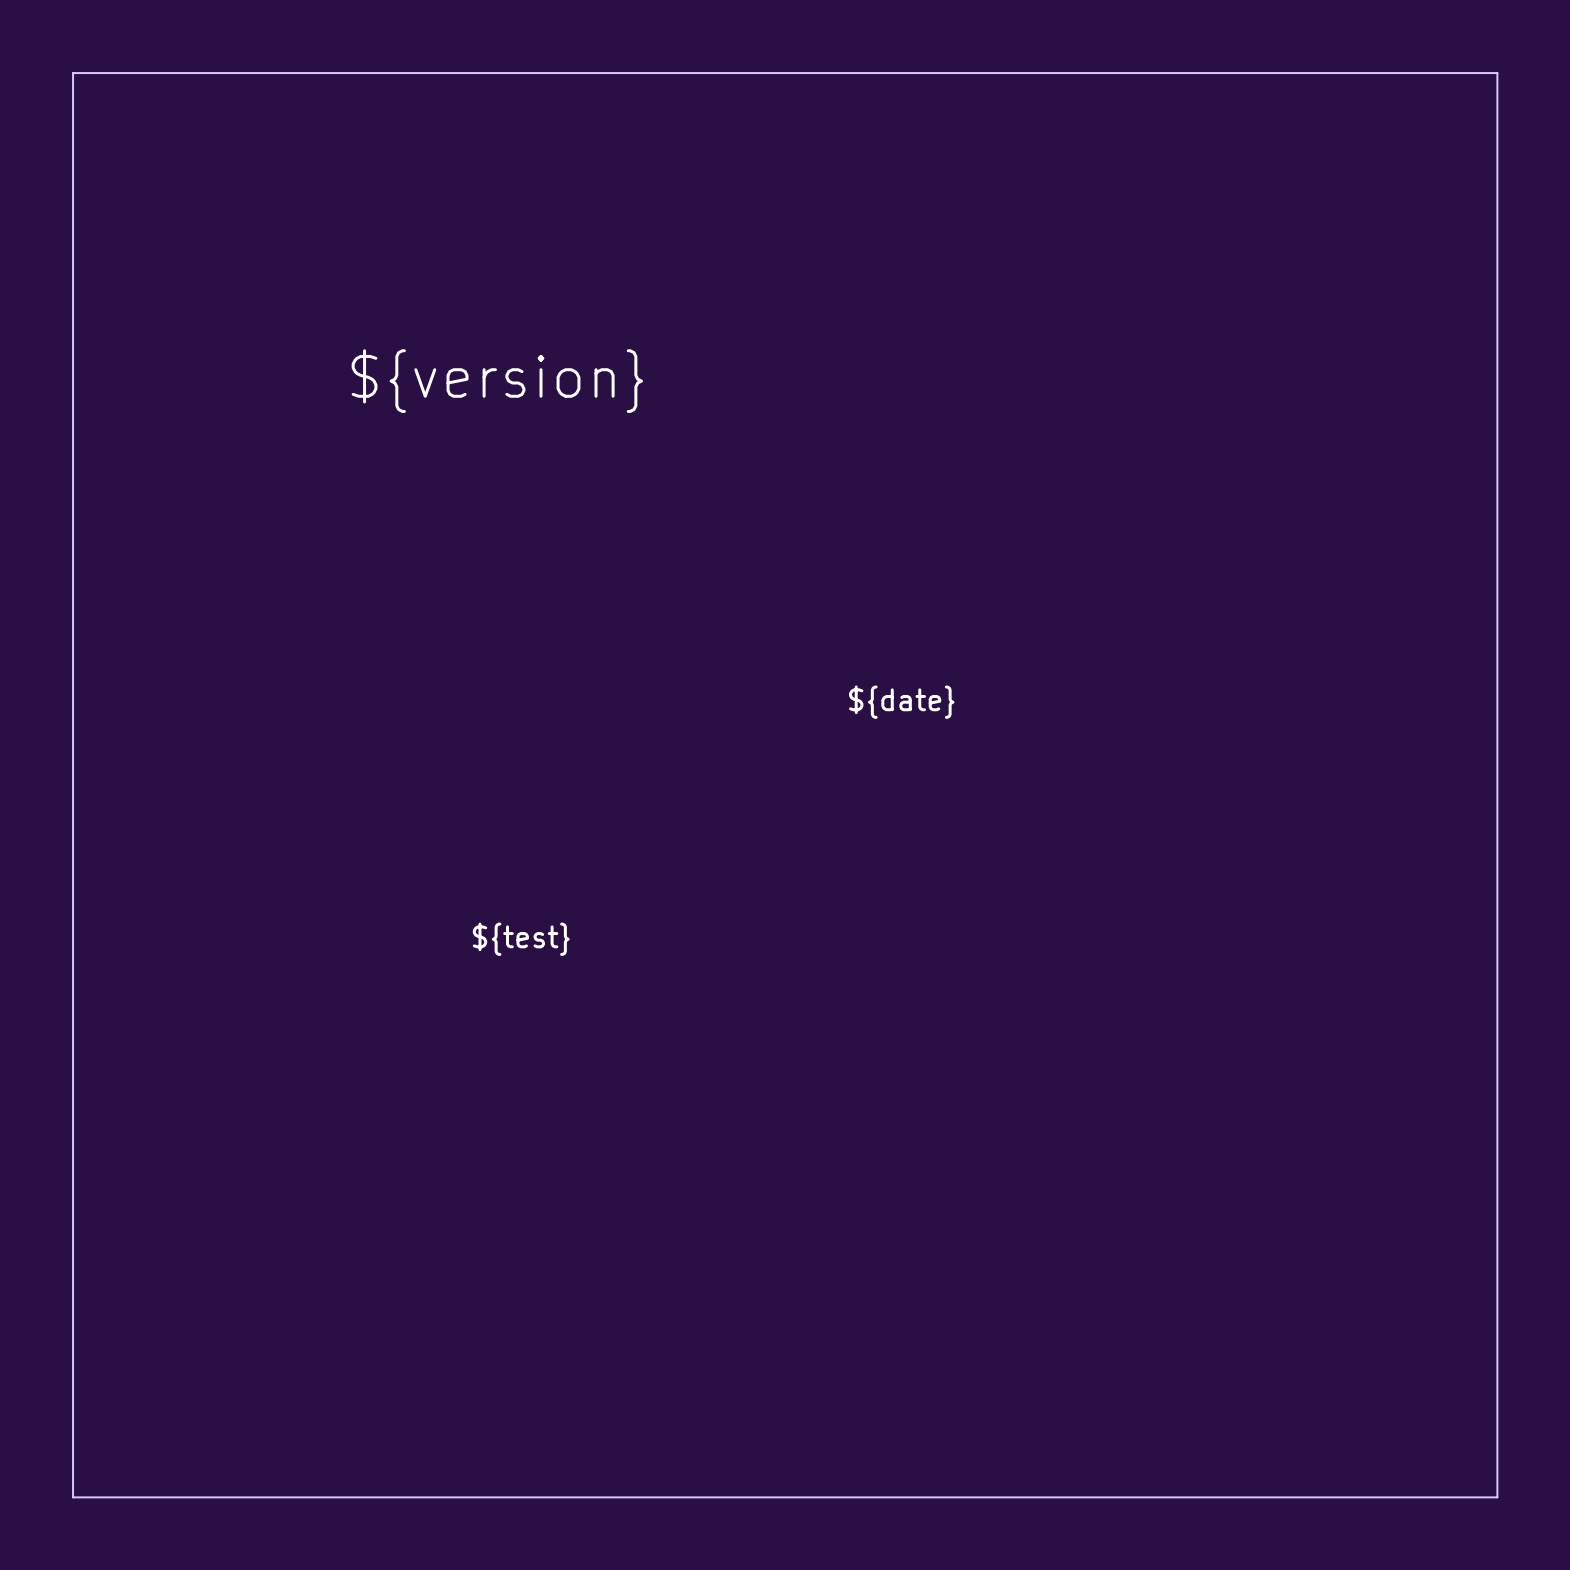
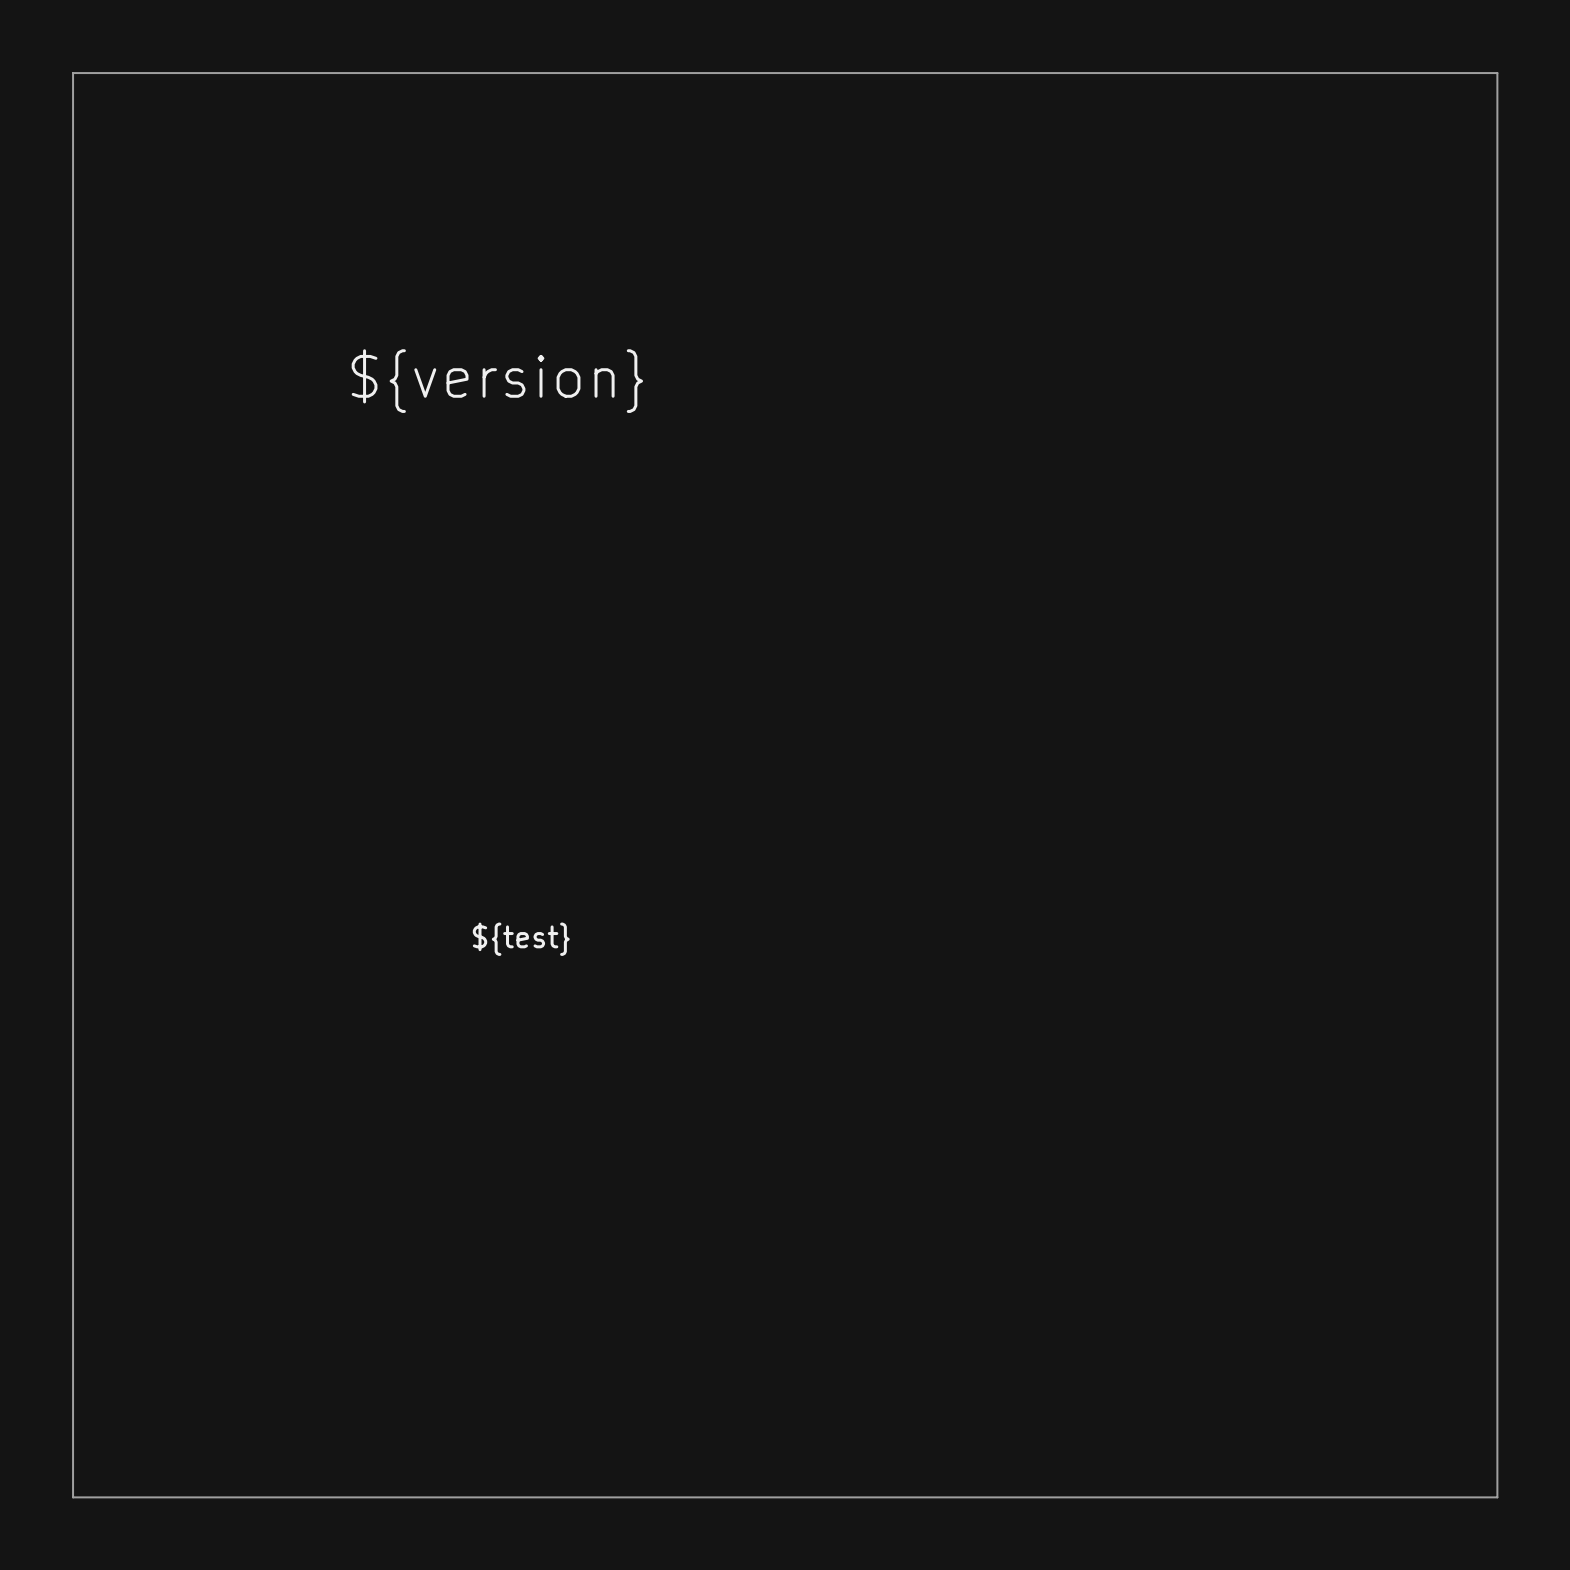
text: ${date} (901, 702) -> none

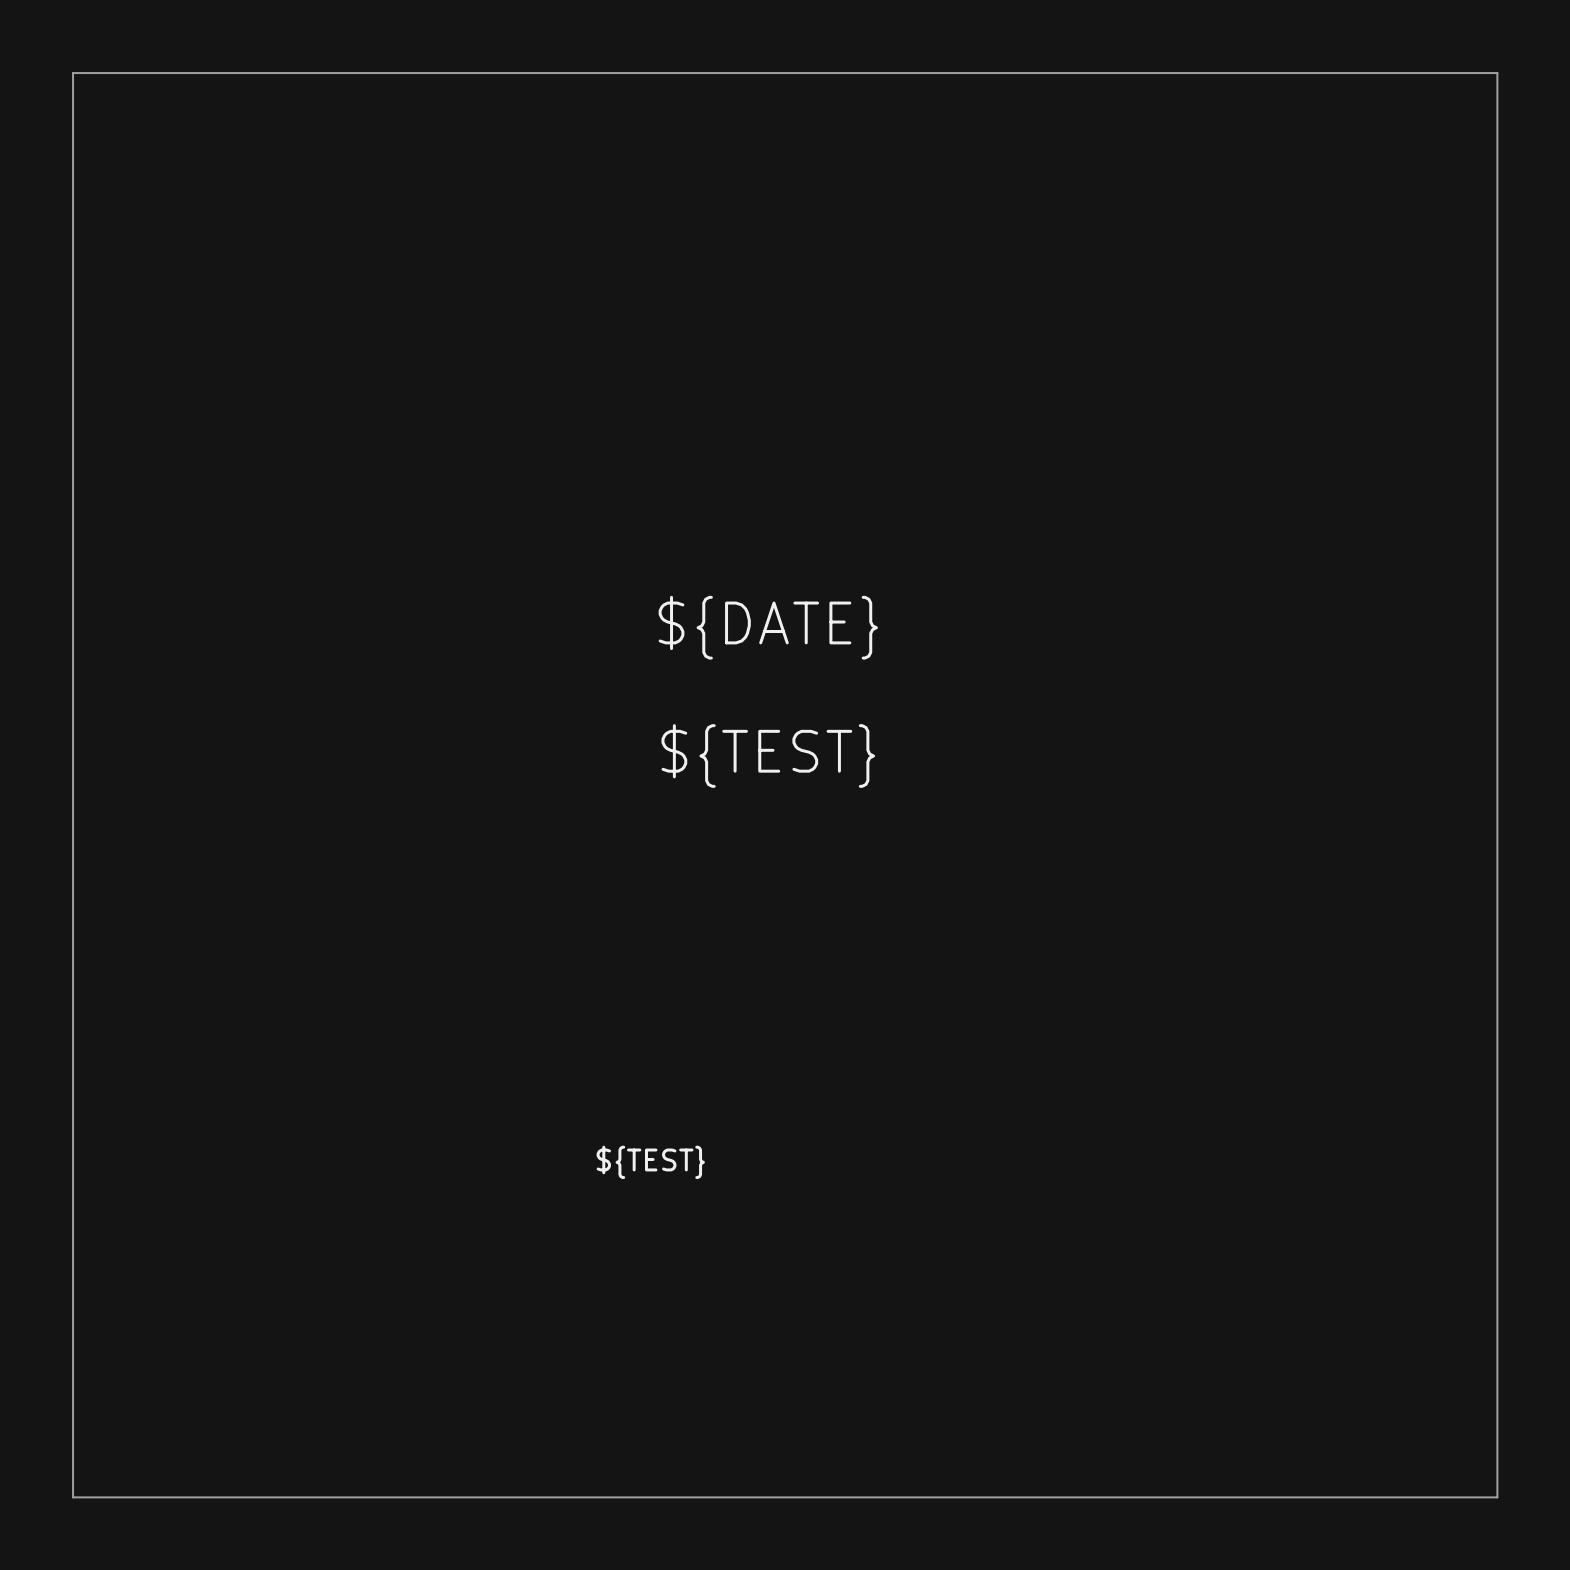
text: ${version} (497, 381) -> none
text: none -> ${DATE} (768, 627)
text: none -> ${TEST} (768, 756)
text: ${test} (521, 939) -> none
text: none -> ${TEST} (650, 1162)

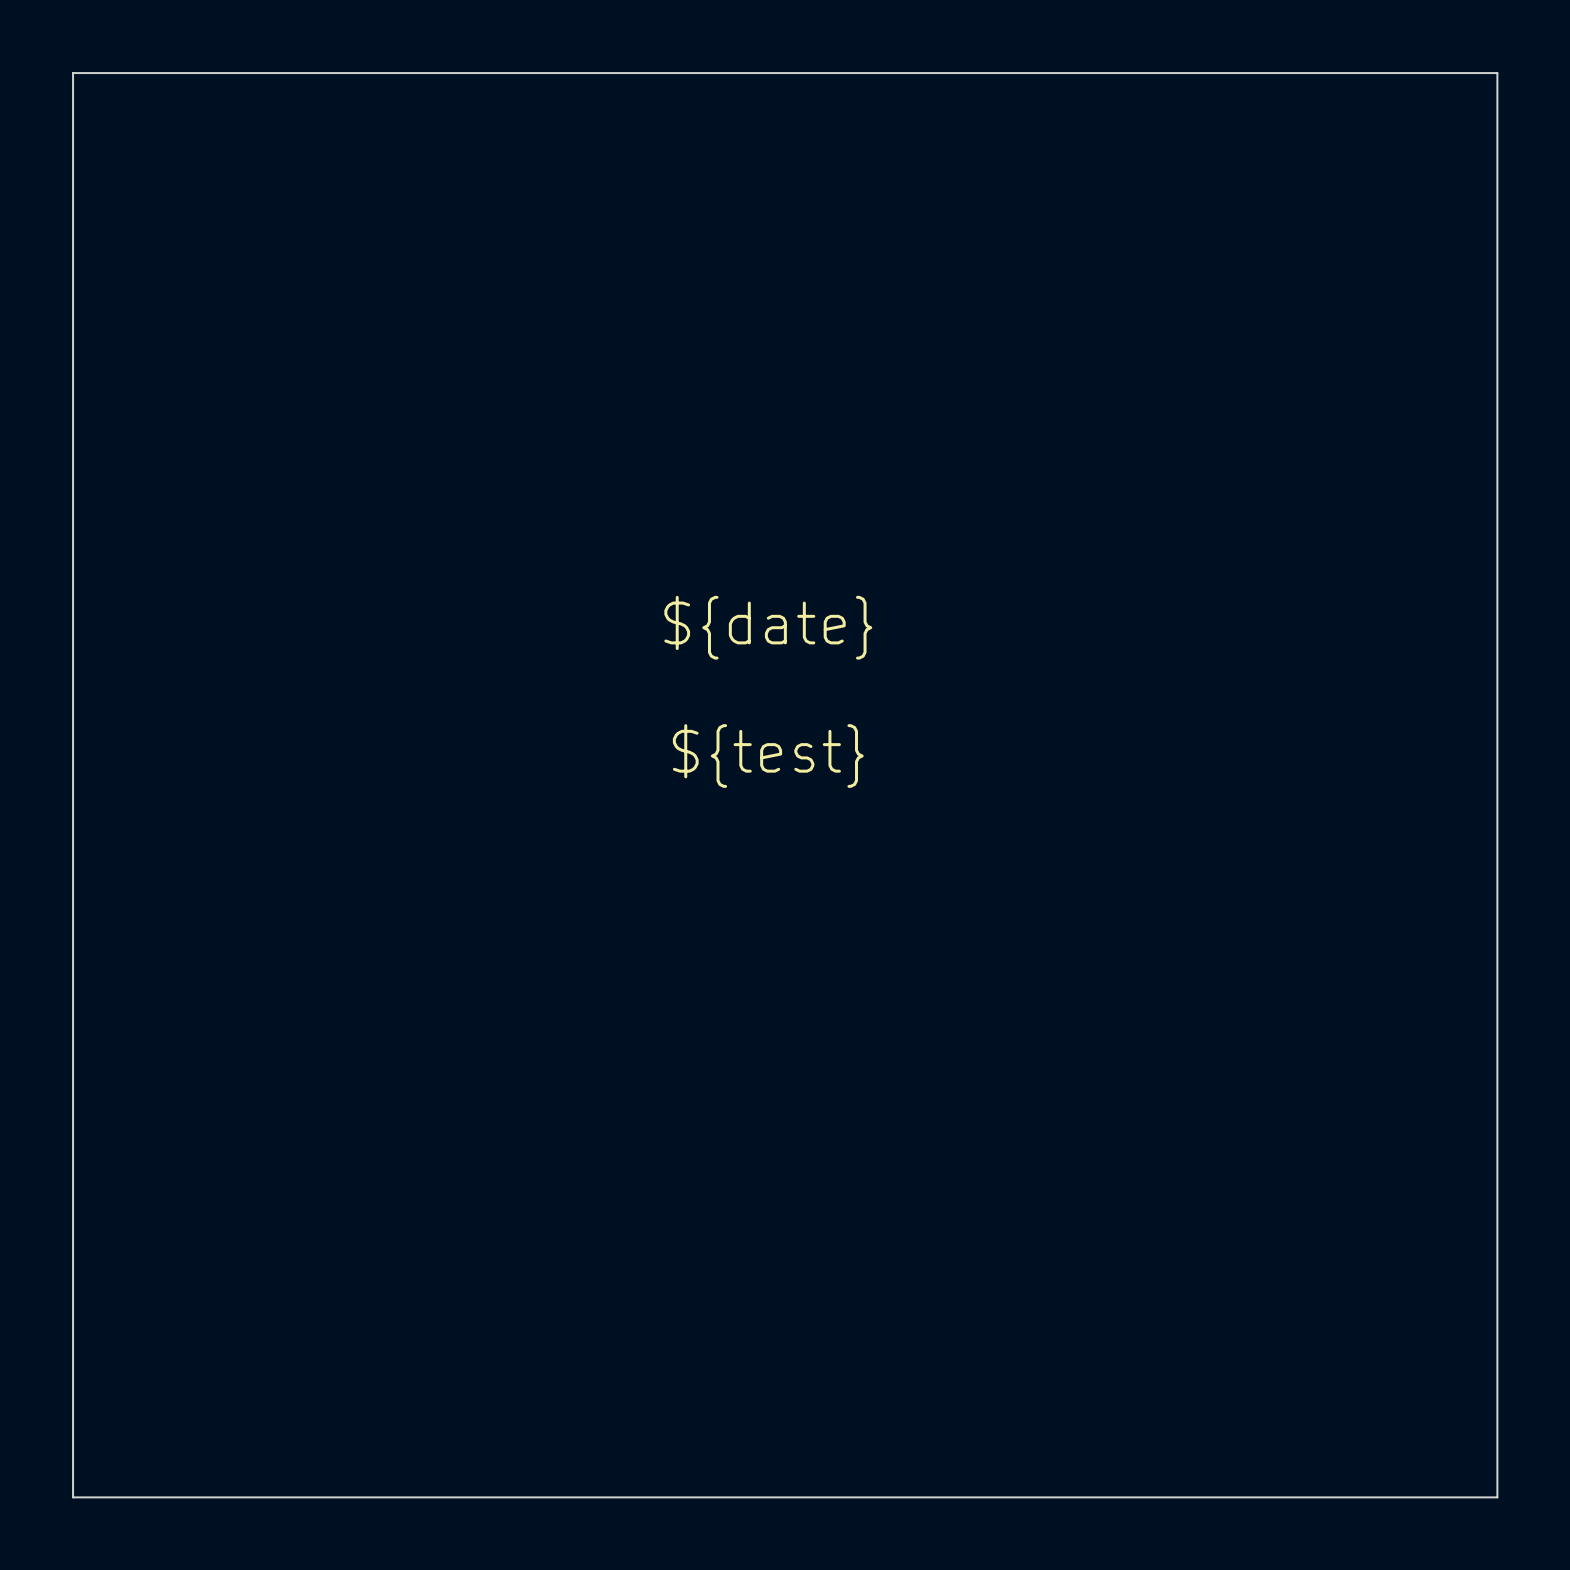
text: ${DATE} (768, 627) -> ${date} (768, 627)
text: ${TEST} (768, 756) -> ${test} (768, 756)
text: ${TEST} (650, 1162) -> none

